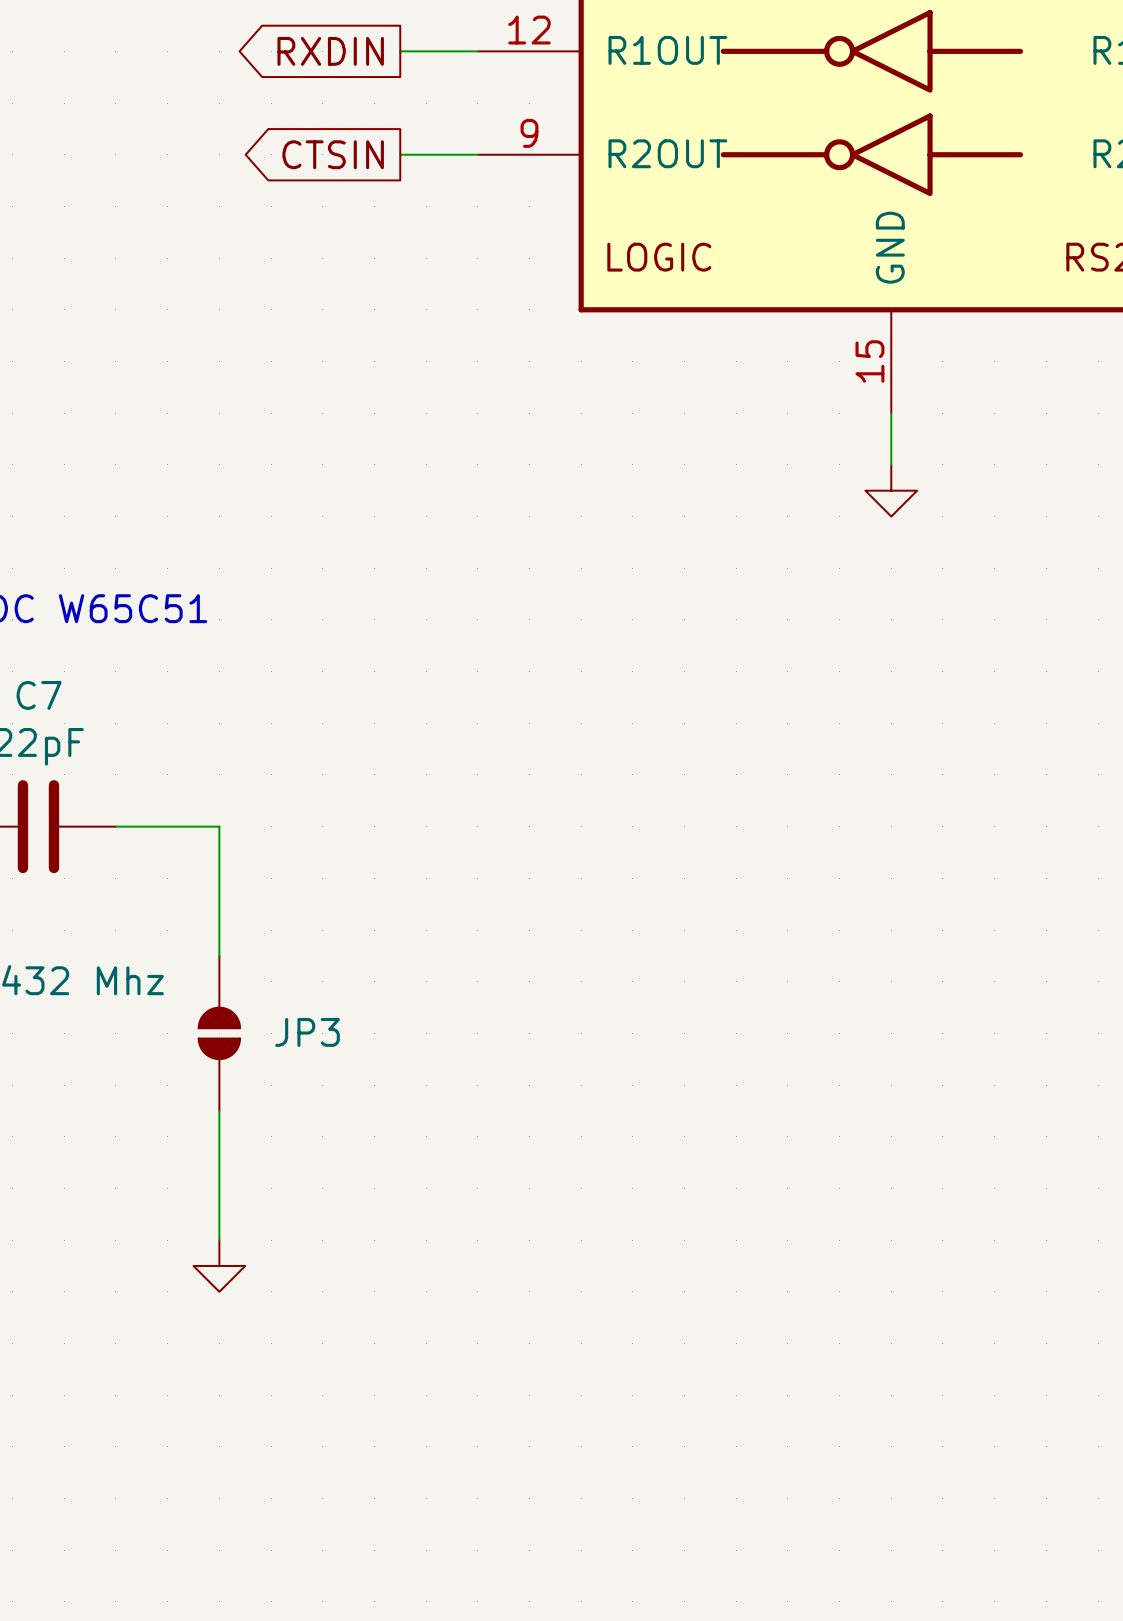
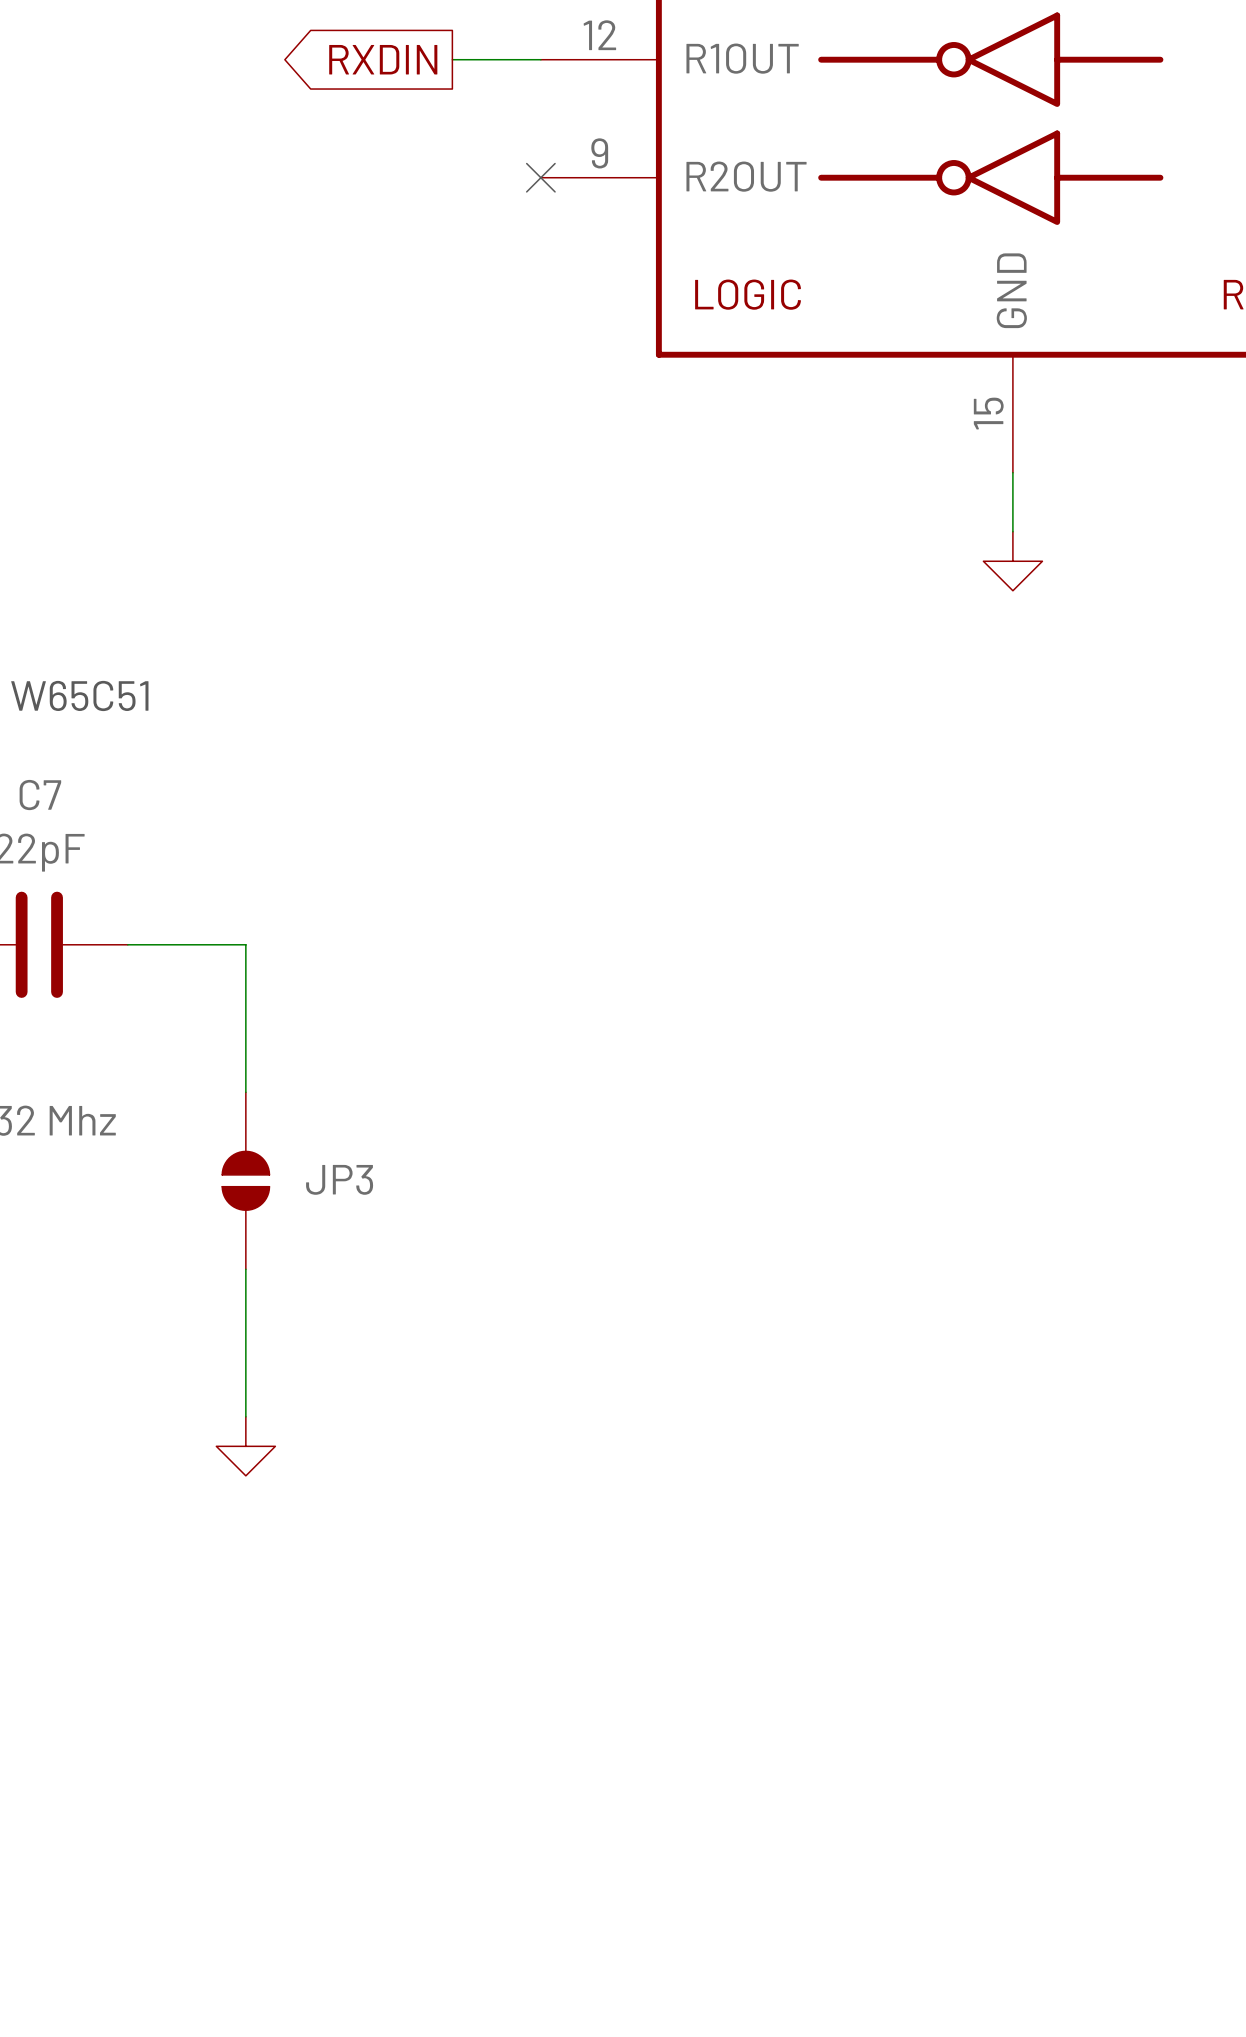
global label: CTSIN (333, 154) -> none
wire: (400, 154) (477, 154) -> none
no-connect mark: none -> (540, 177)

